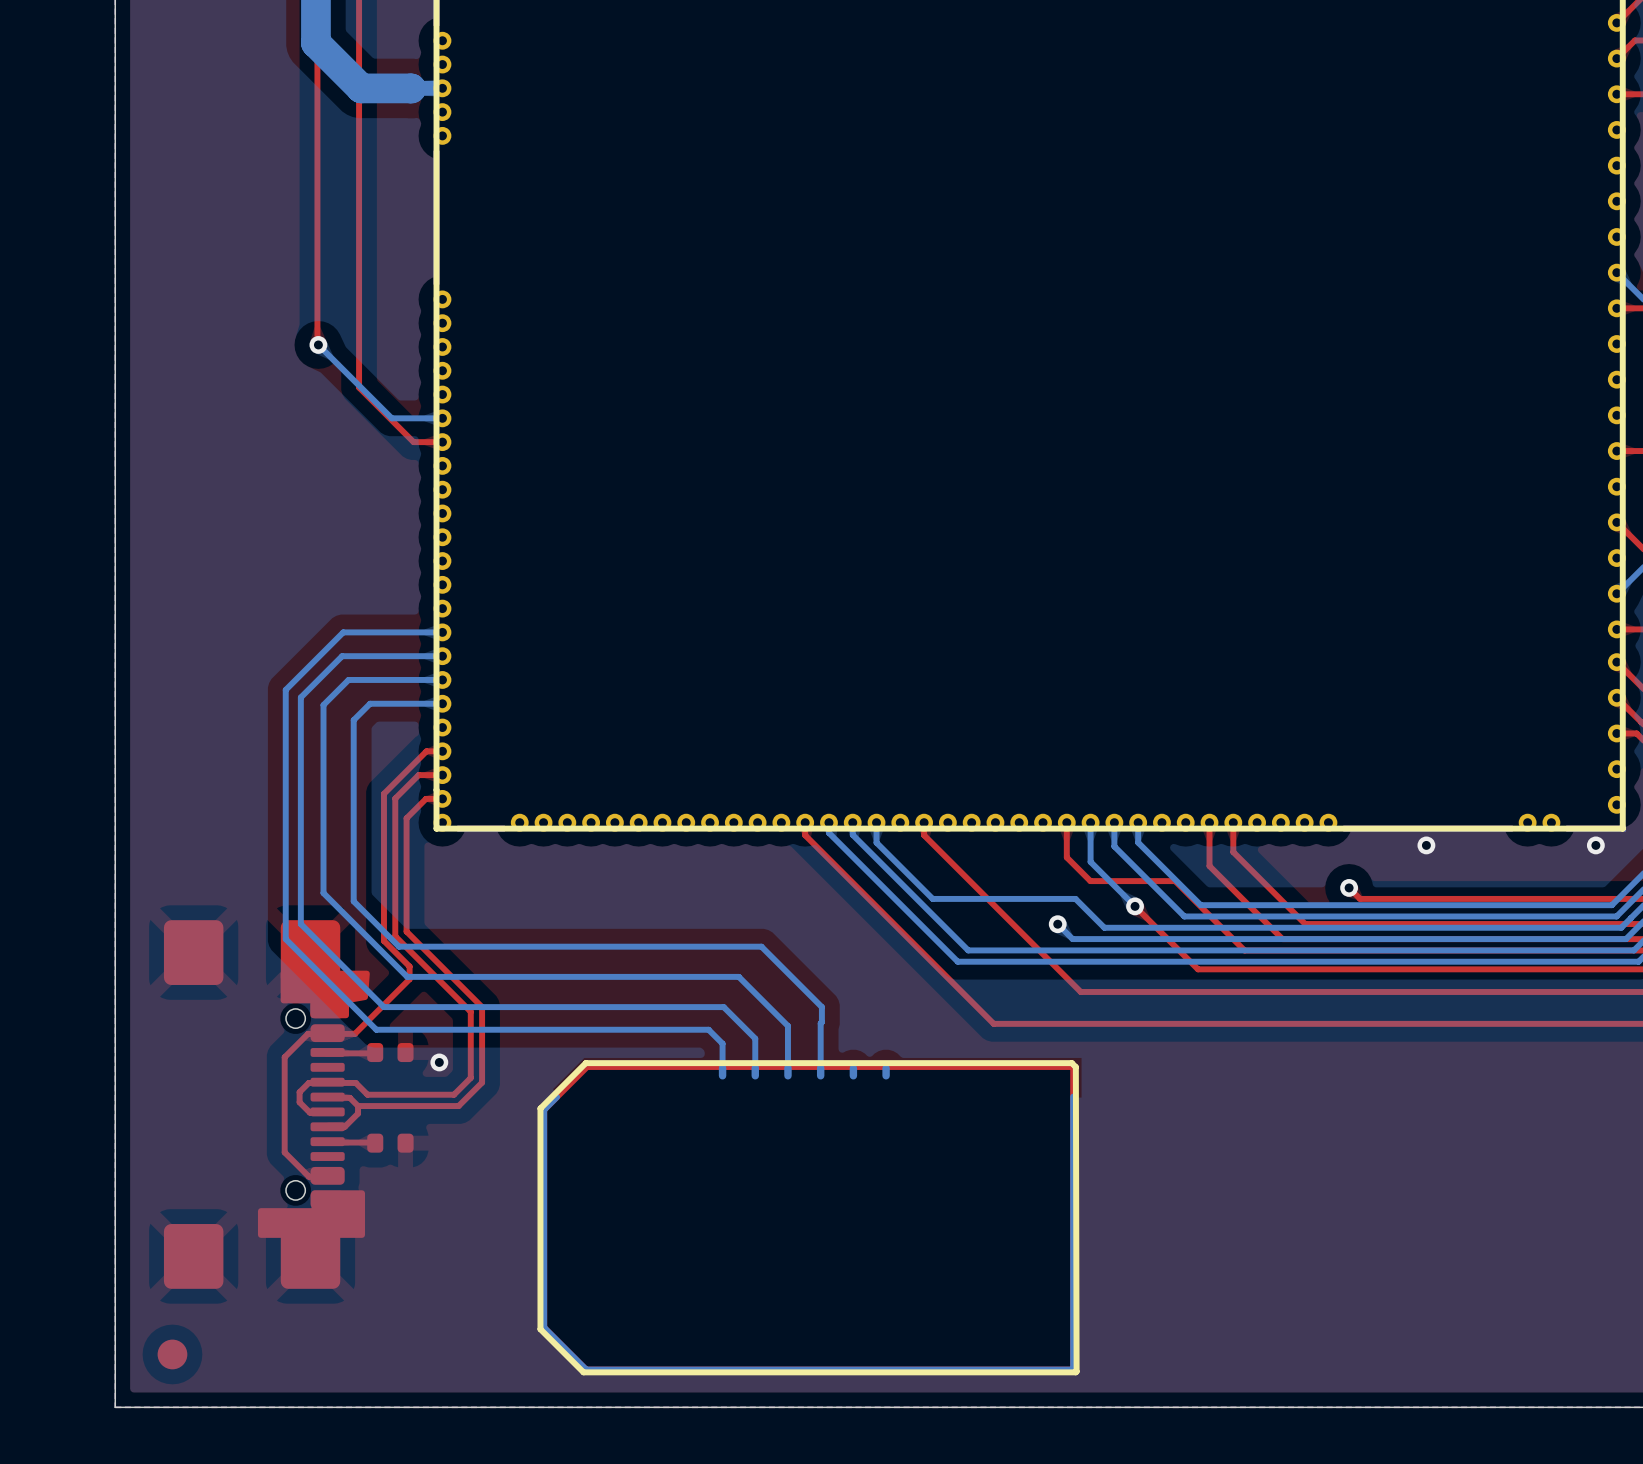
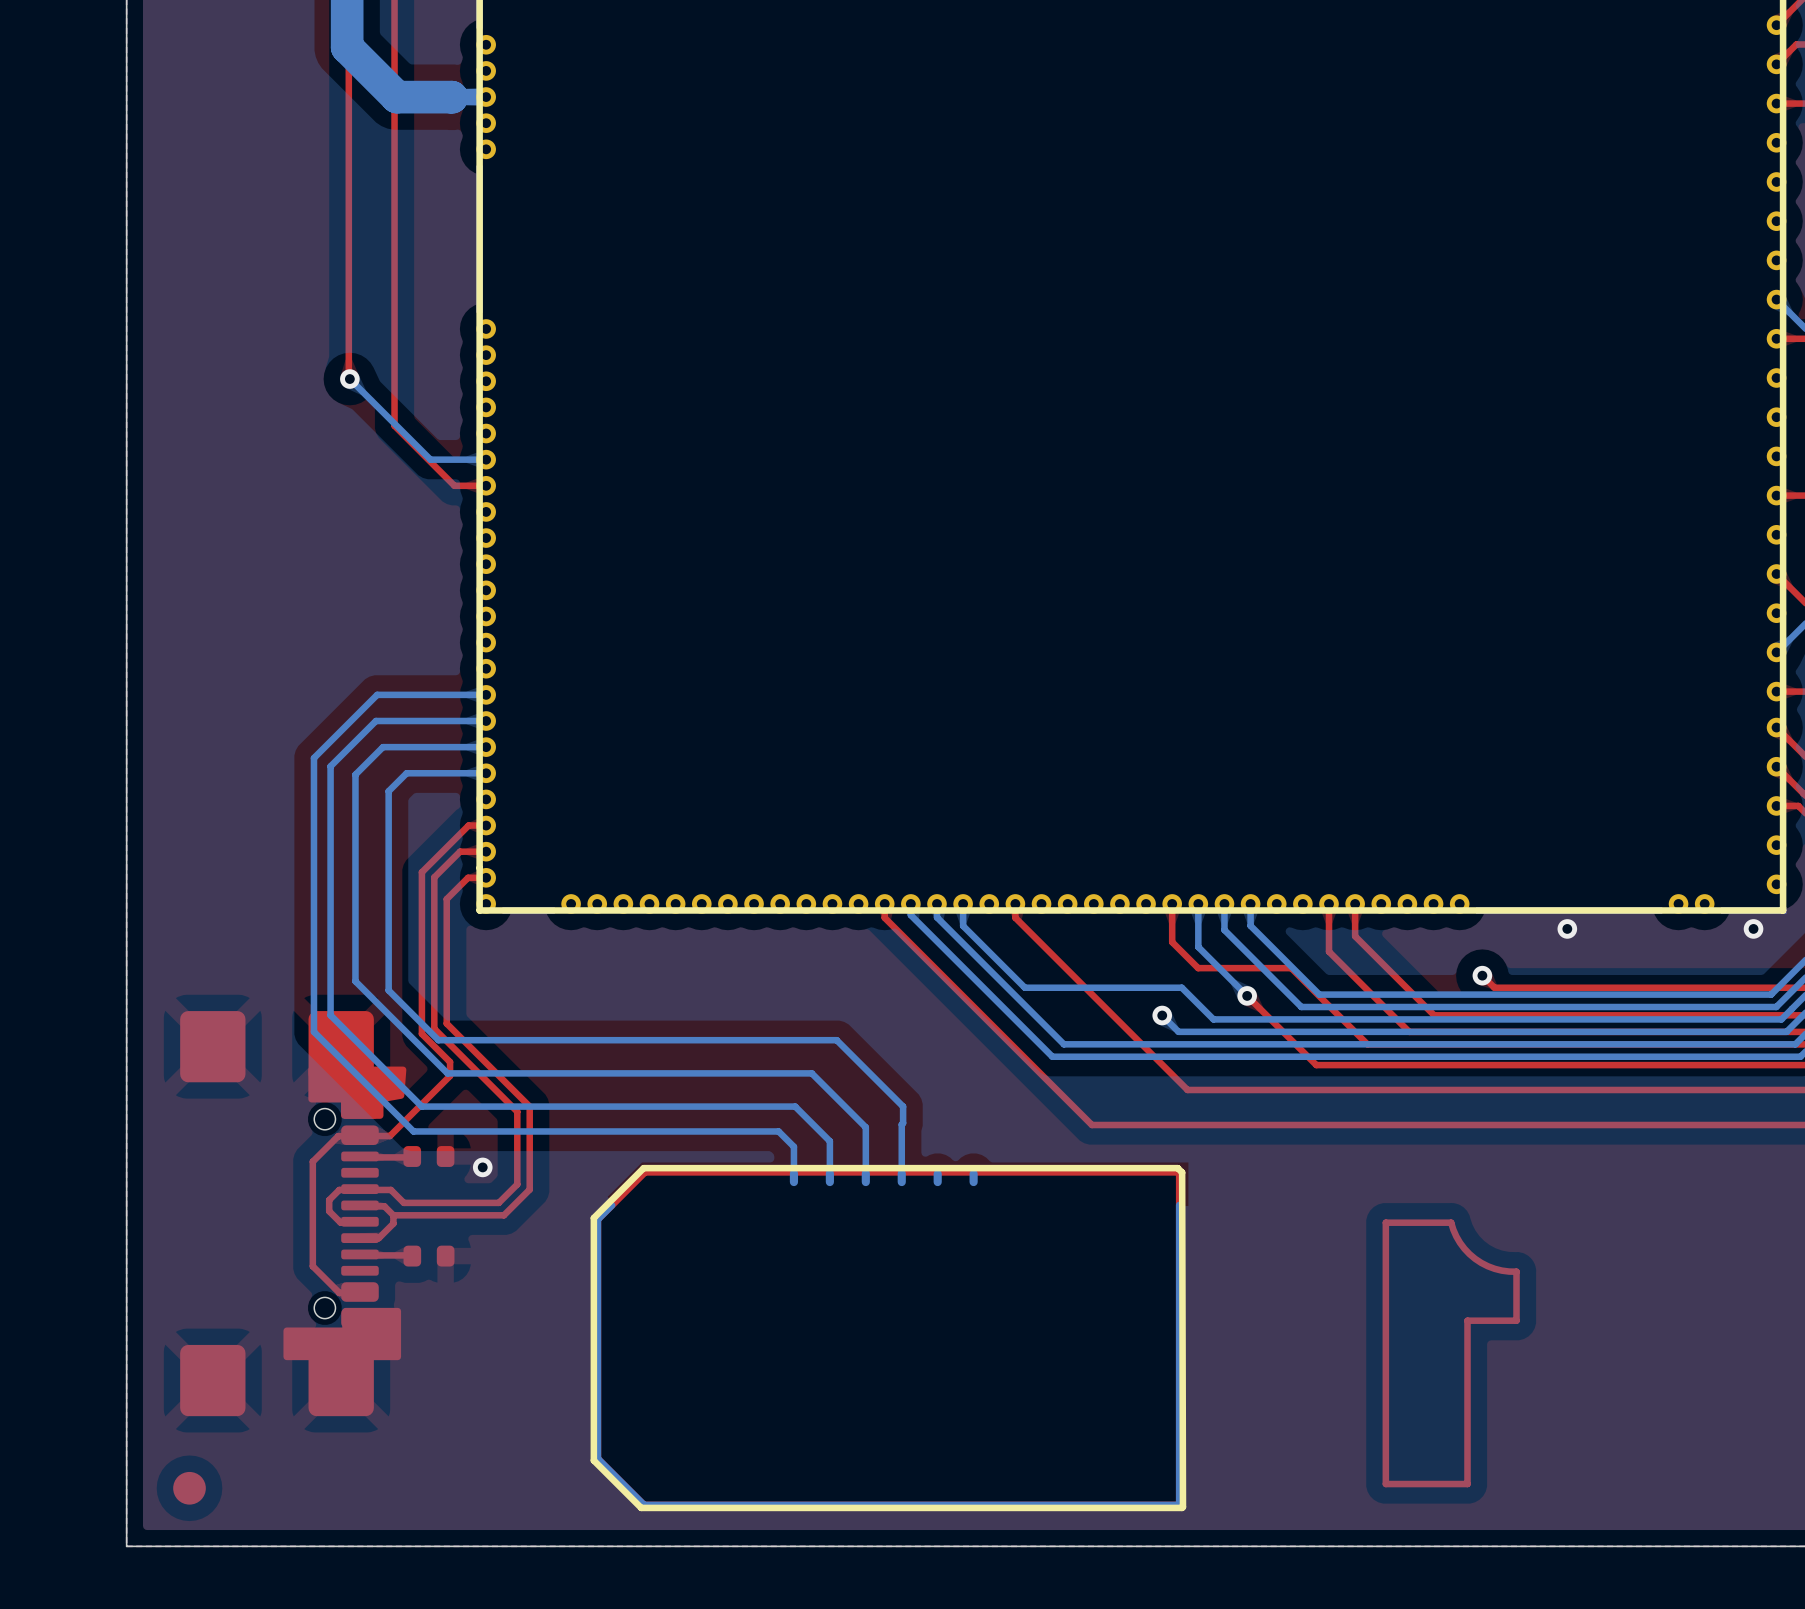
drawing: none -> [1382, 1219, 1520, 1488]

